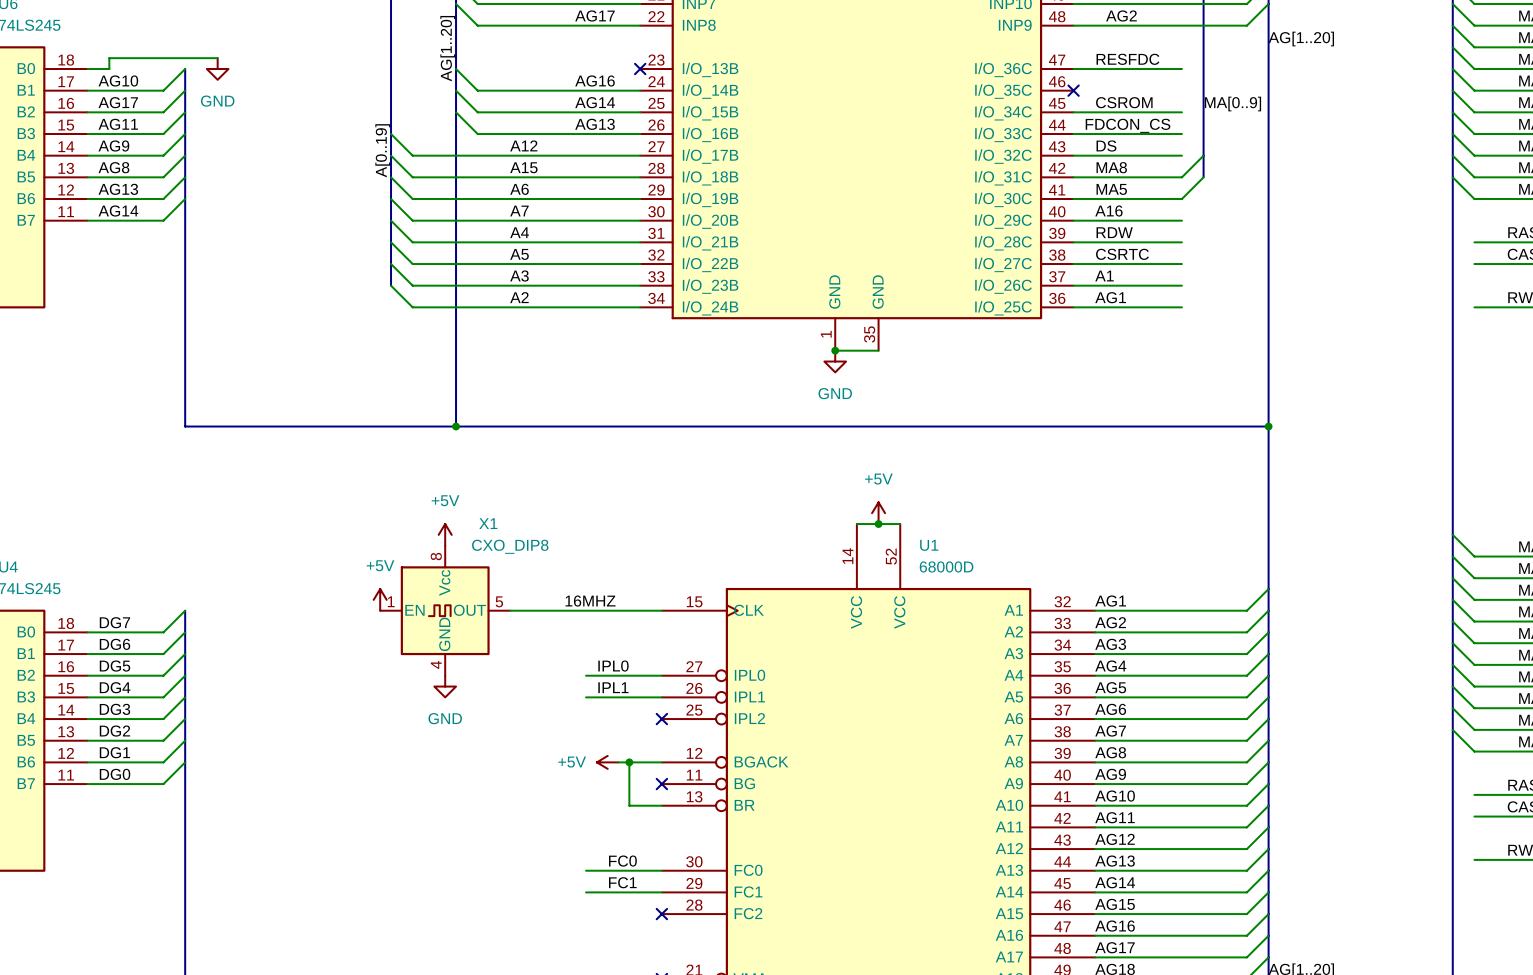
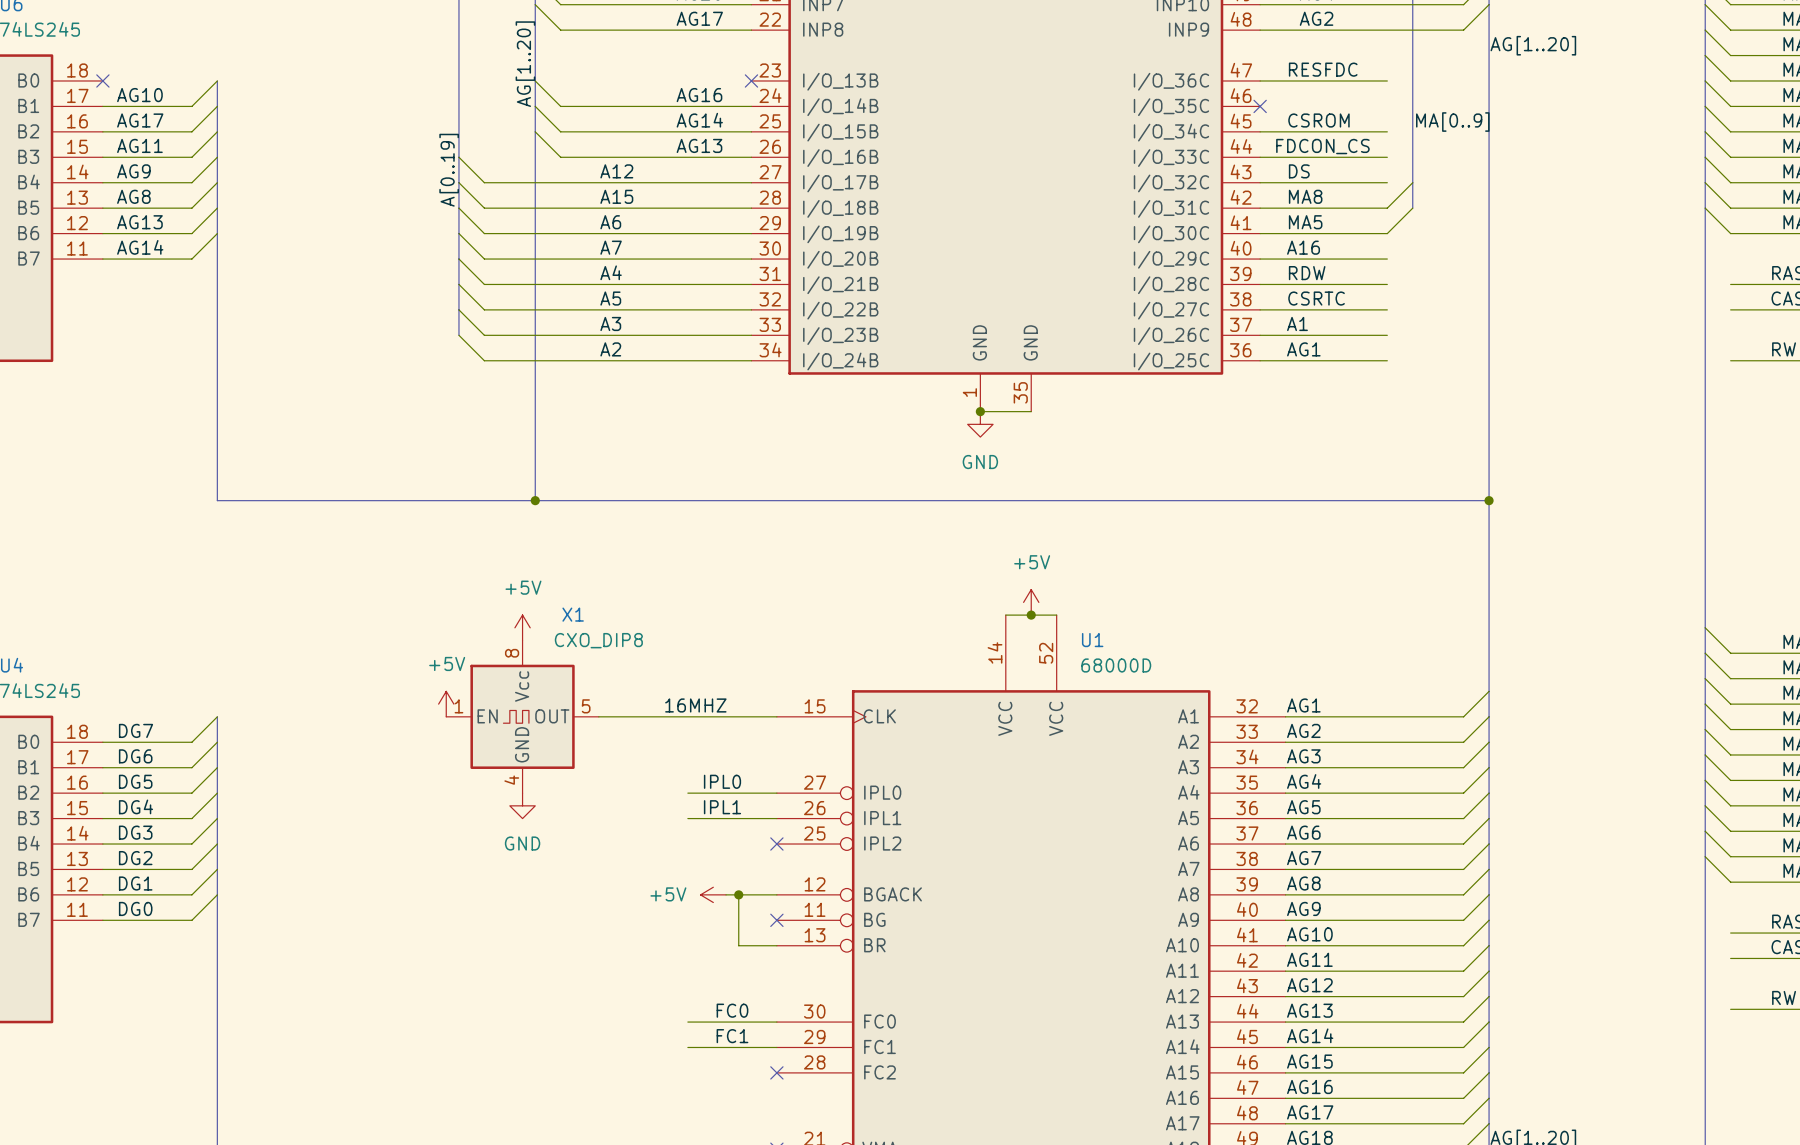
wire: (217, 58) (109, 58) (109, 69) (87, 69) -> none
no-connect mark: none -> (102, 80)
power symbol: GND (217, 69) -> none

